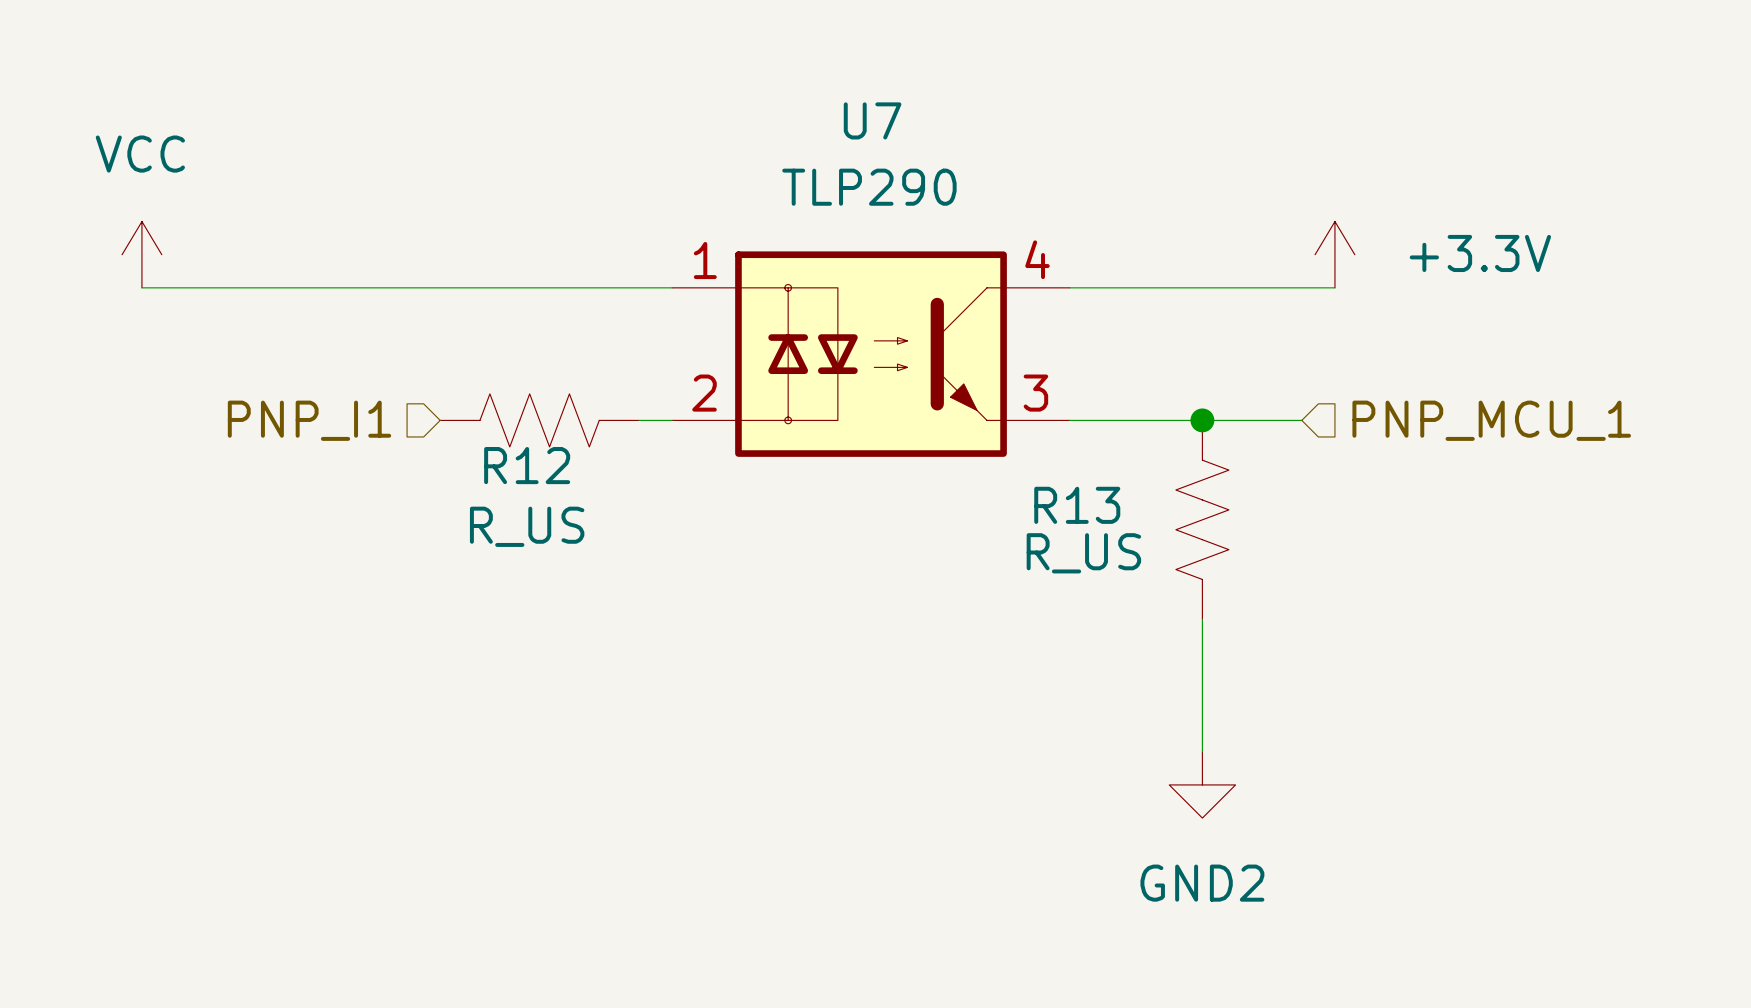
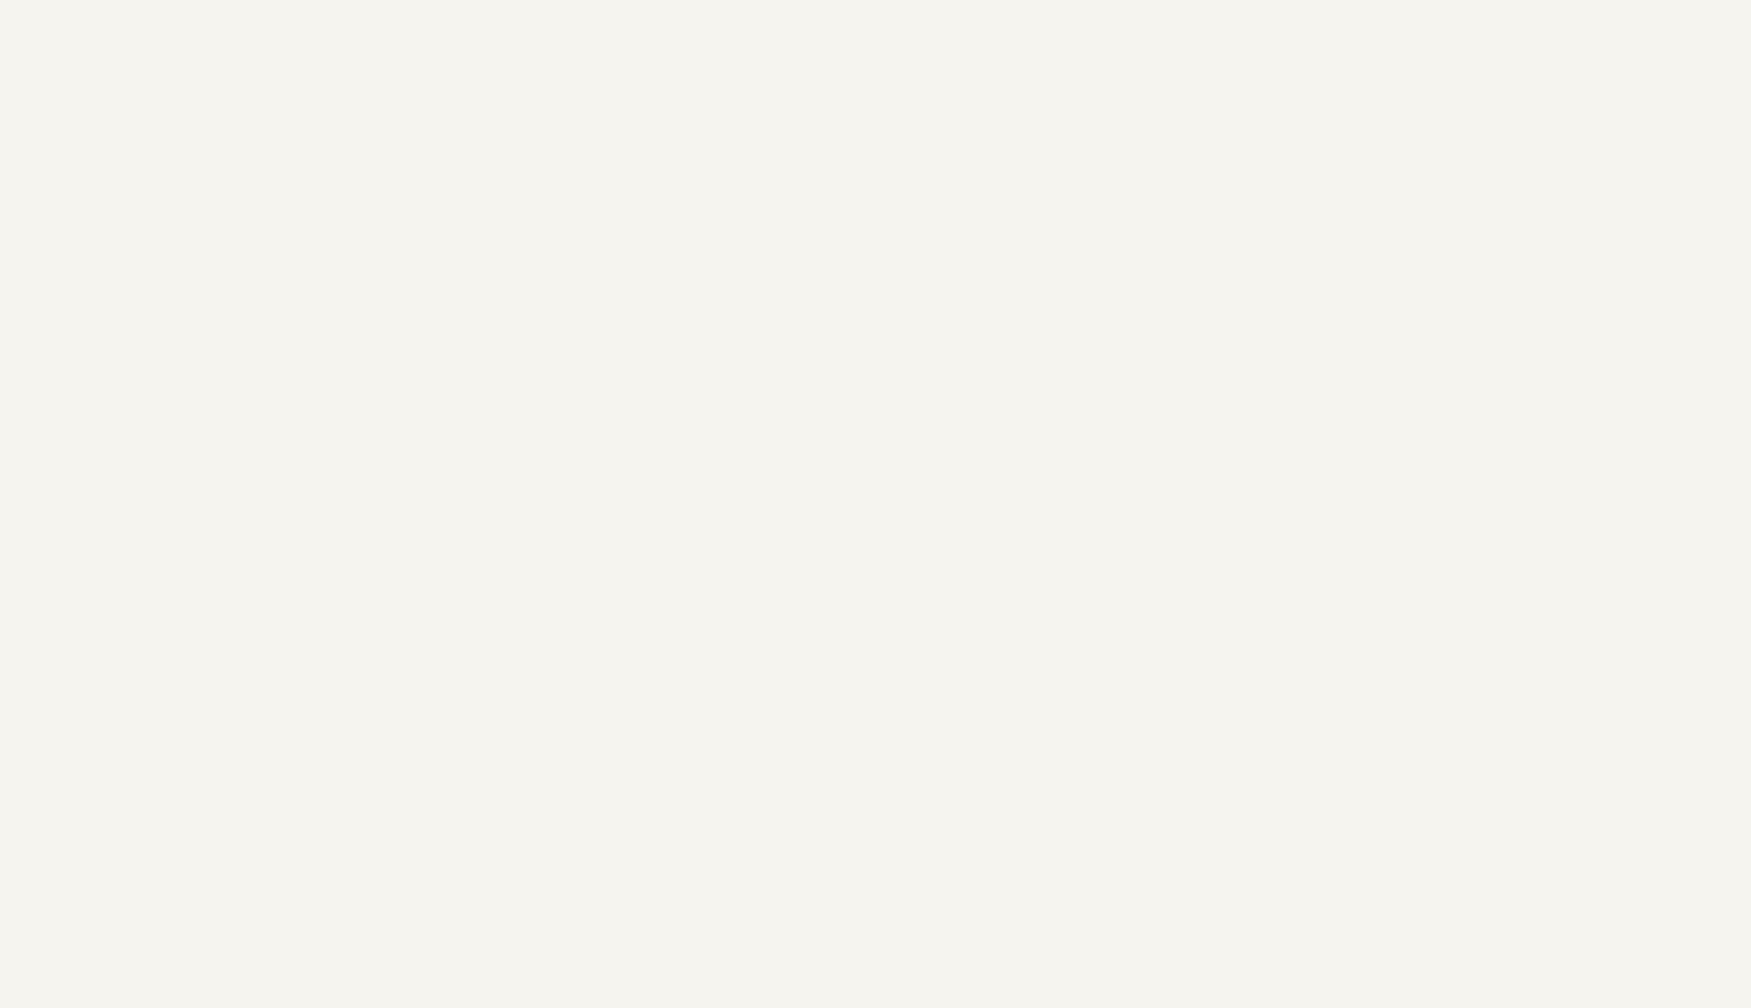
power symbol: VCC (141, 254) -> none
power symbol: +3.3V (1334, 254) -> none
wire: (141, 287) (672, 287) -> none
wire: (1069, 287) (1334, 287) -> none
U7: TLP290 (871, 354) -> none
hierarchical label: PNP_I1 (309, 420) -> none
R12: R_US (539, 420) -> none
wire: (639, 420) (672, 420) -> none
wire: (1069, 420) (1301, 420) -> none
junction: (1202, 420) -> none
hierarchical label: PNP_MCU_1 (1491, 420) -> none
R13: R_US (1202, 519) -> none
wire: (1202, 619) (1202, 751) -> none
power symbol: GND2 (1202, 784) -> none

